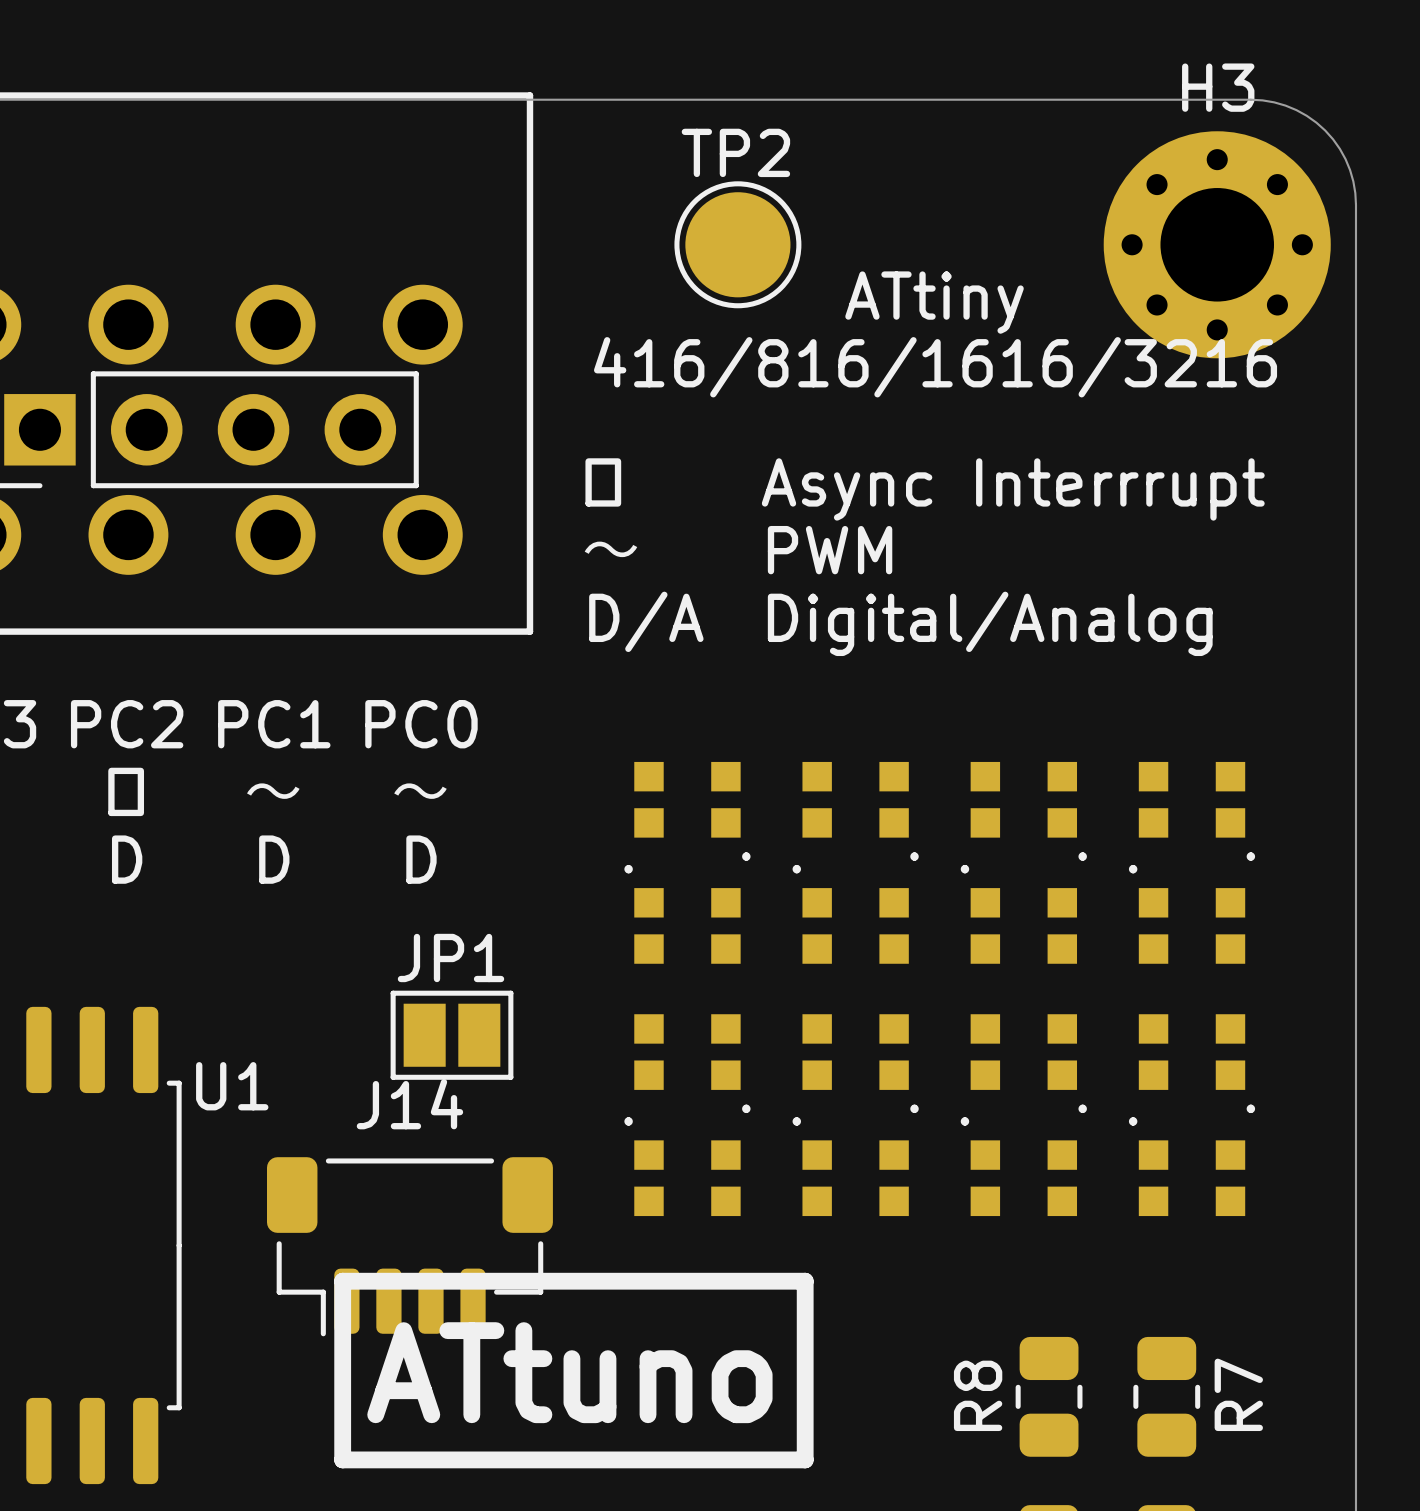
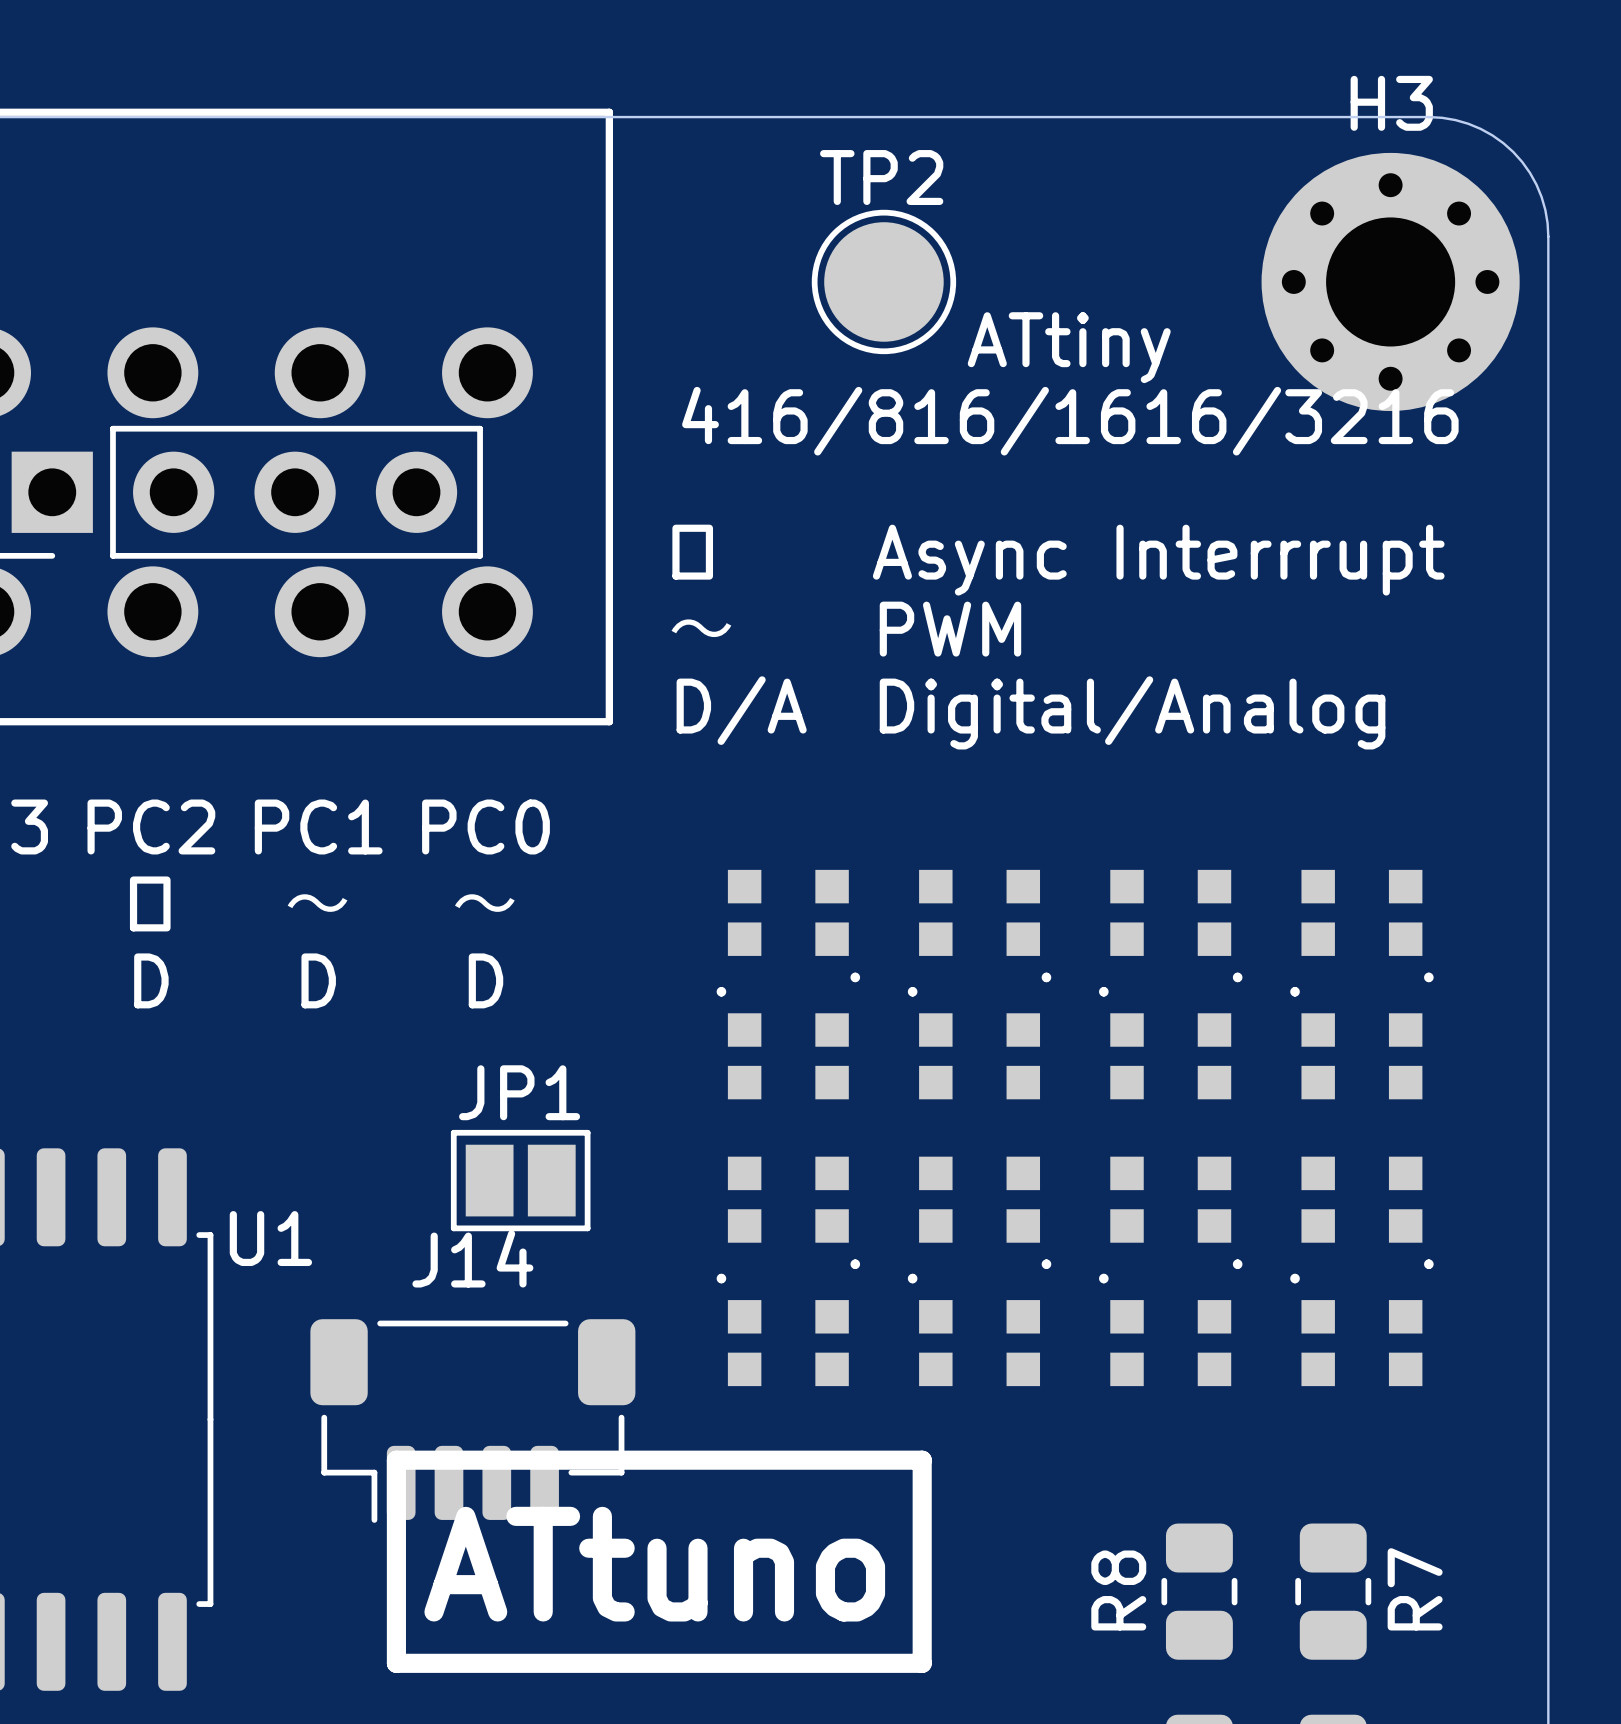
TP2 position: (737, 244) -> (883, 281)

